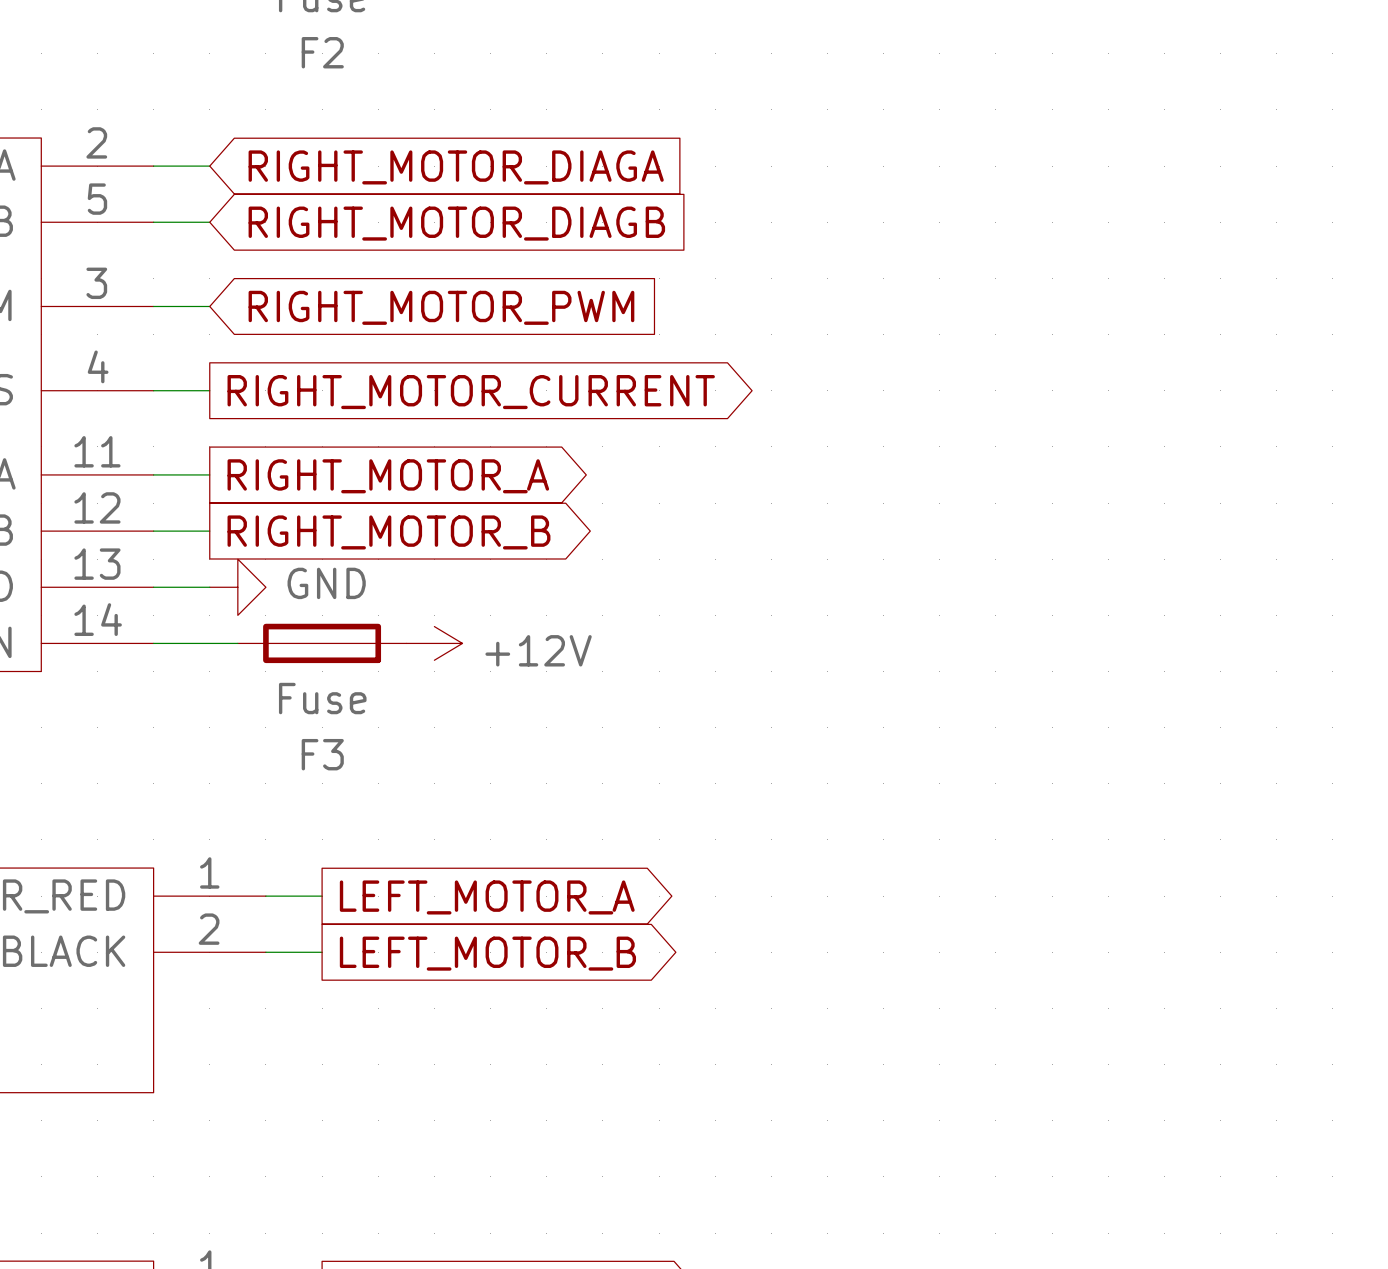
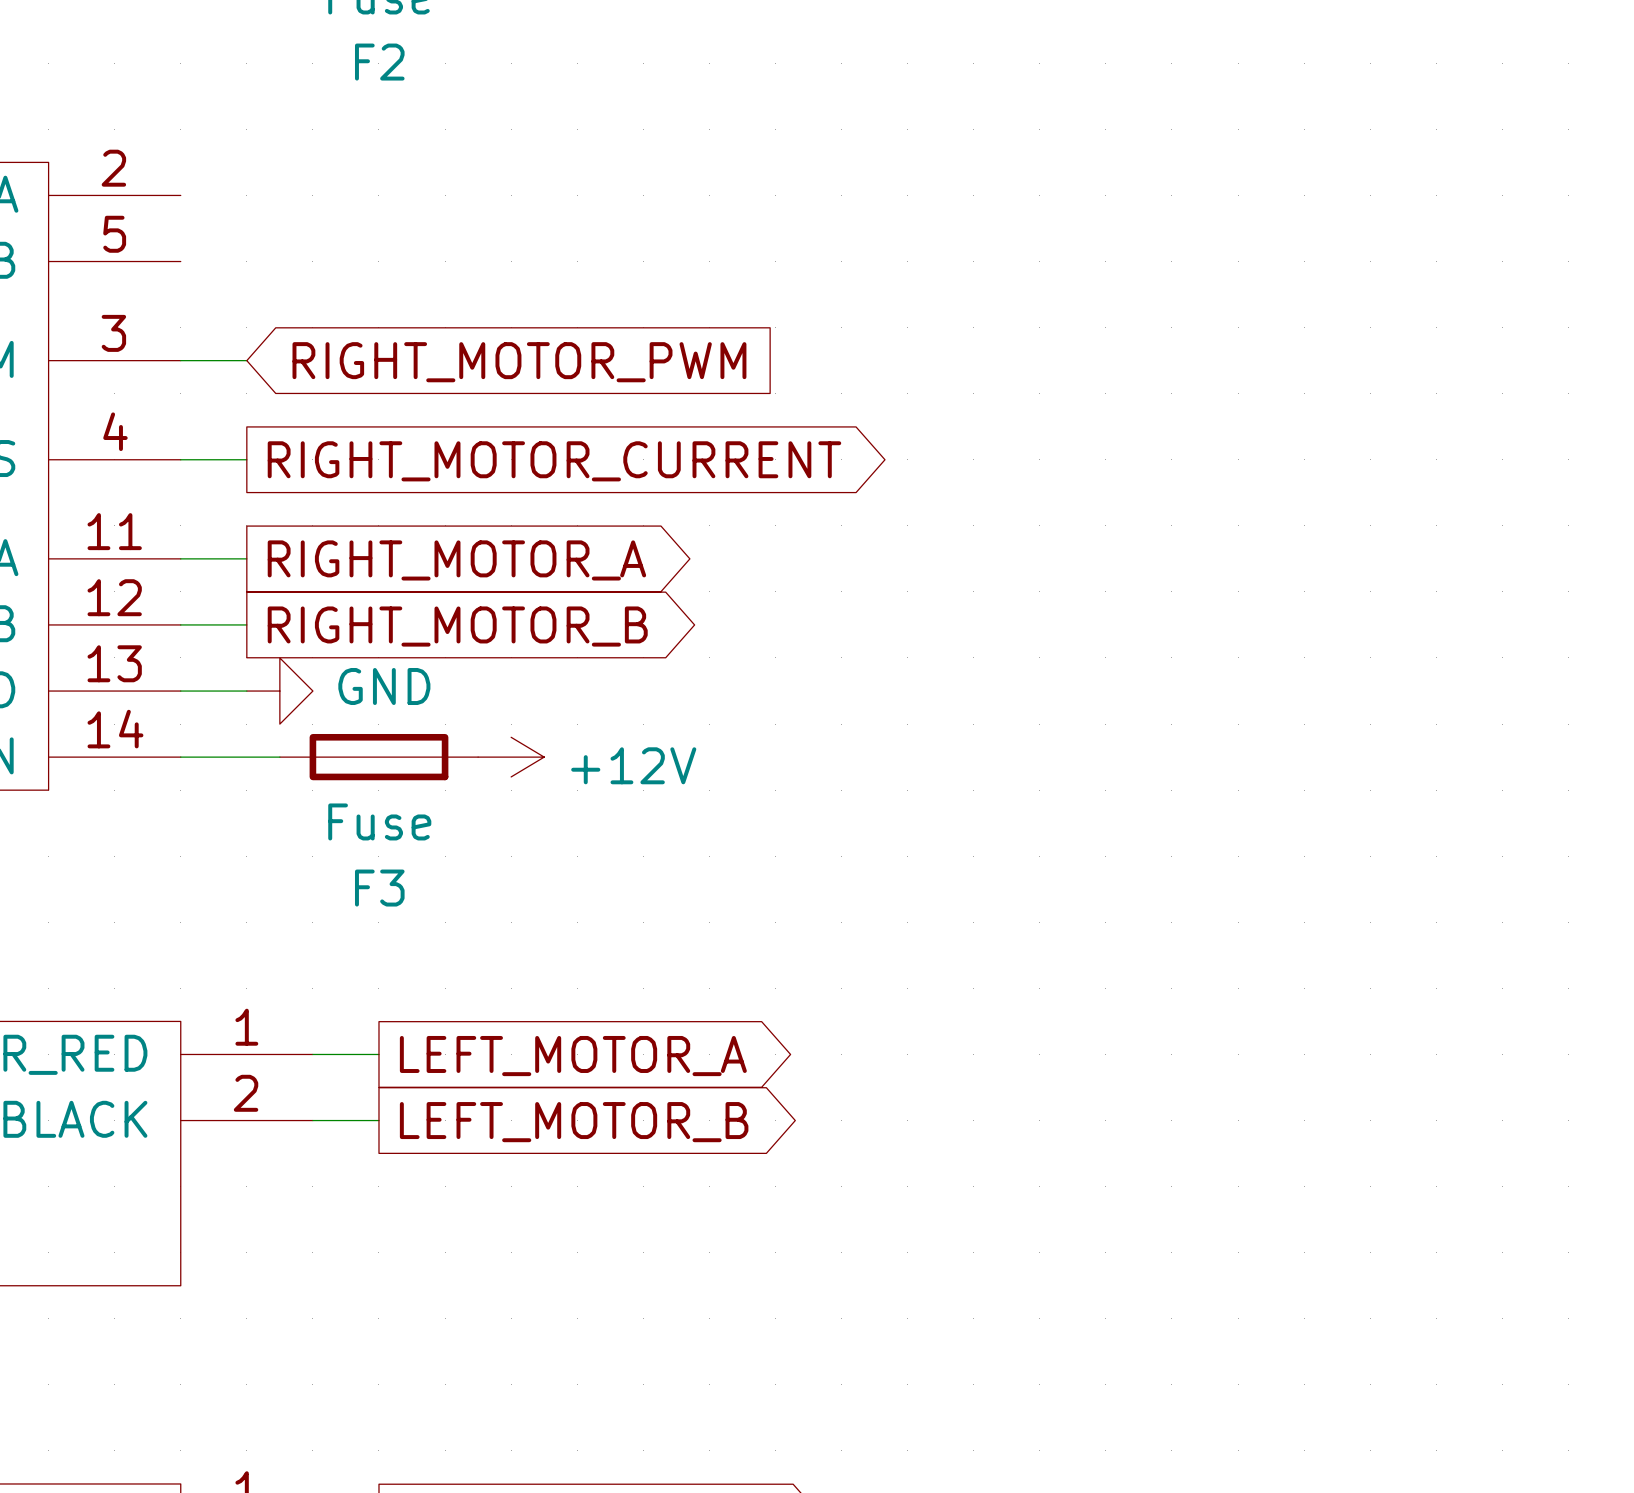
wire: (153, 166) (209, 166) -> none
global label: RIGHT_MOTOR_DIAGA (456, 167) -> none
wire: (153, 222) (209, 222) -> none
global label: RIGHT_MOTOR_DIAGB (456, 223) -> none

